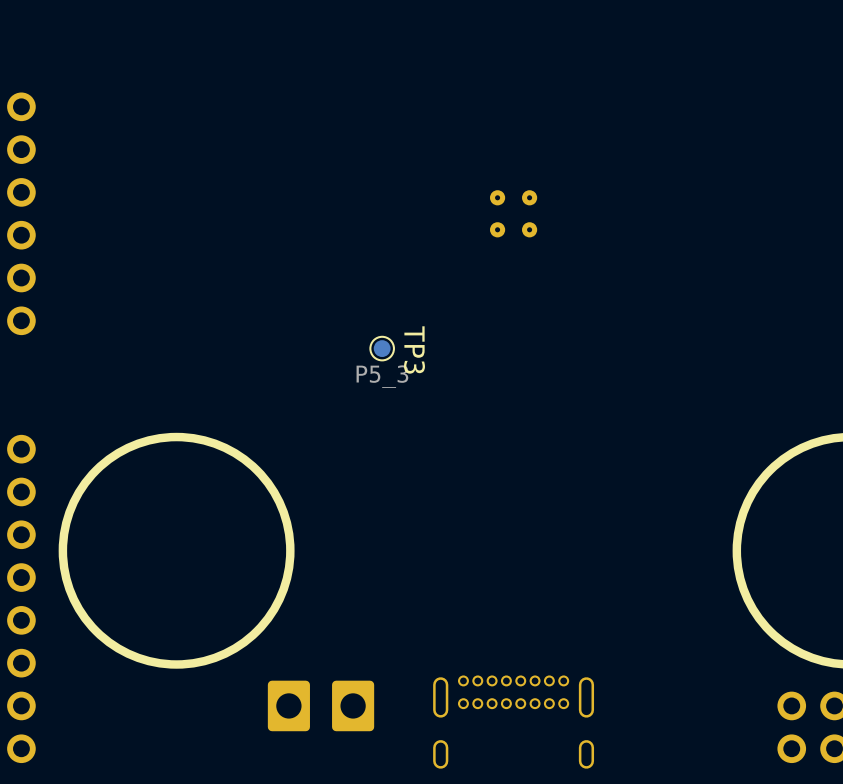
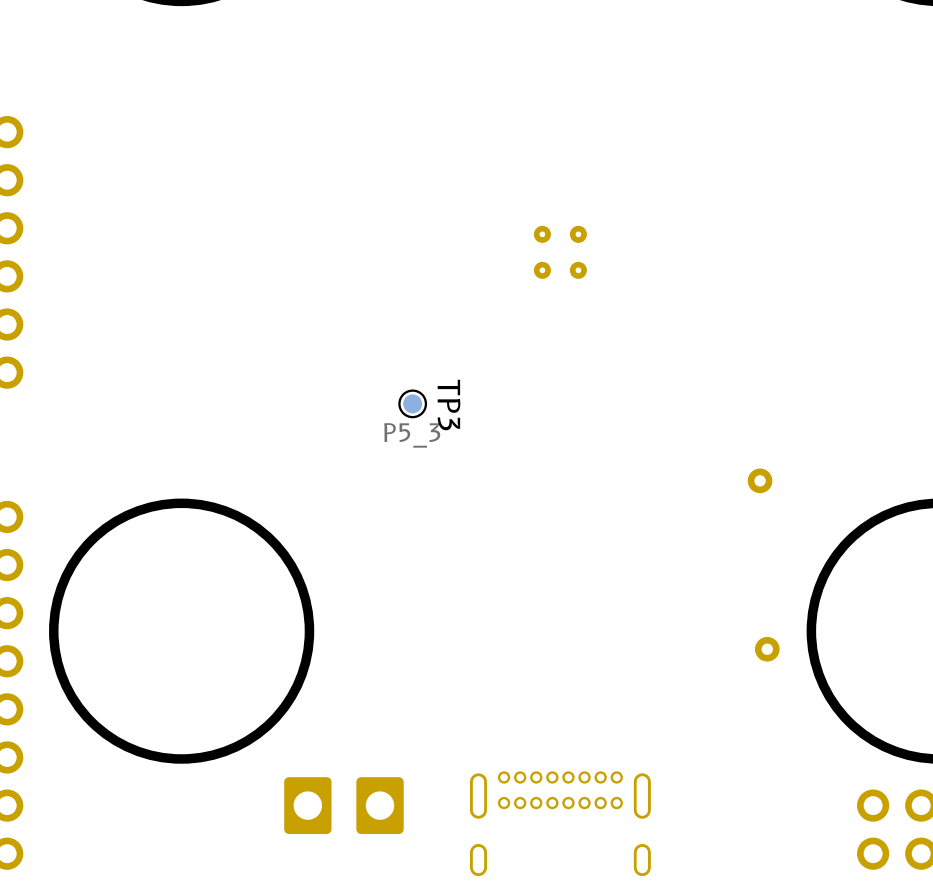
part: none -> (760, 480)
part: none -> (767, 649)

